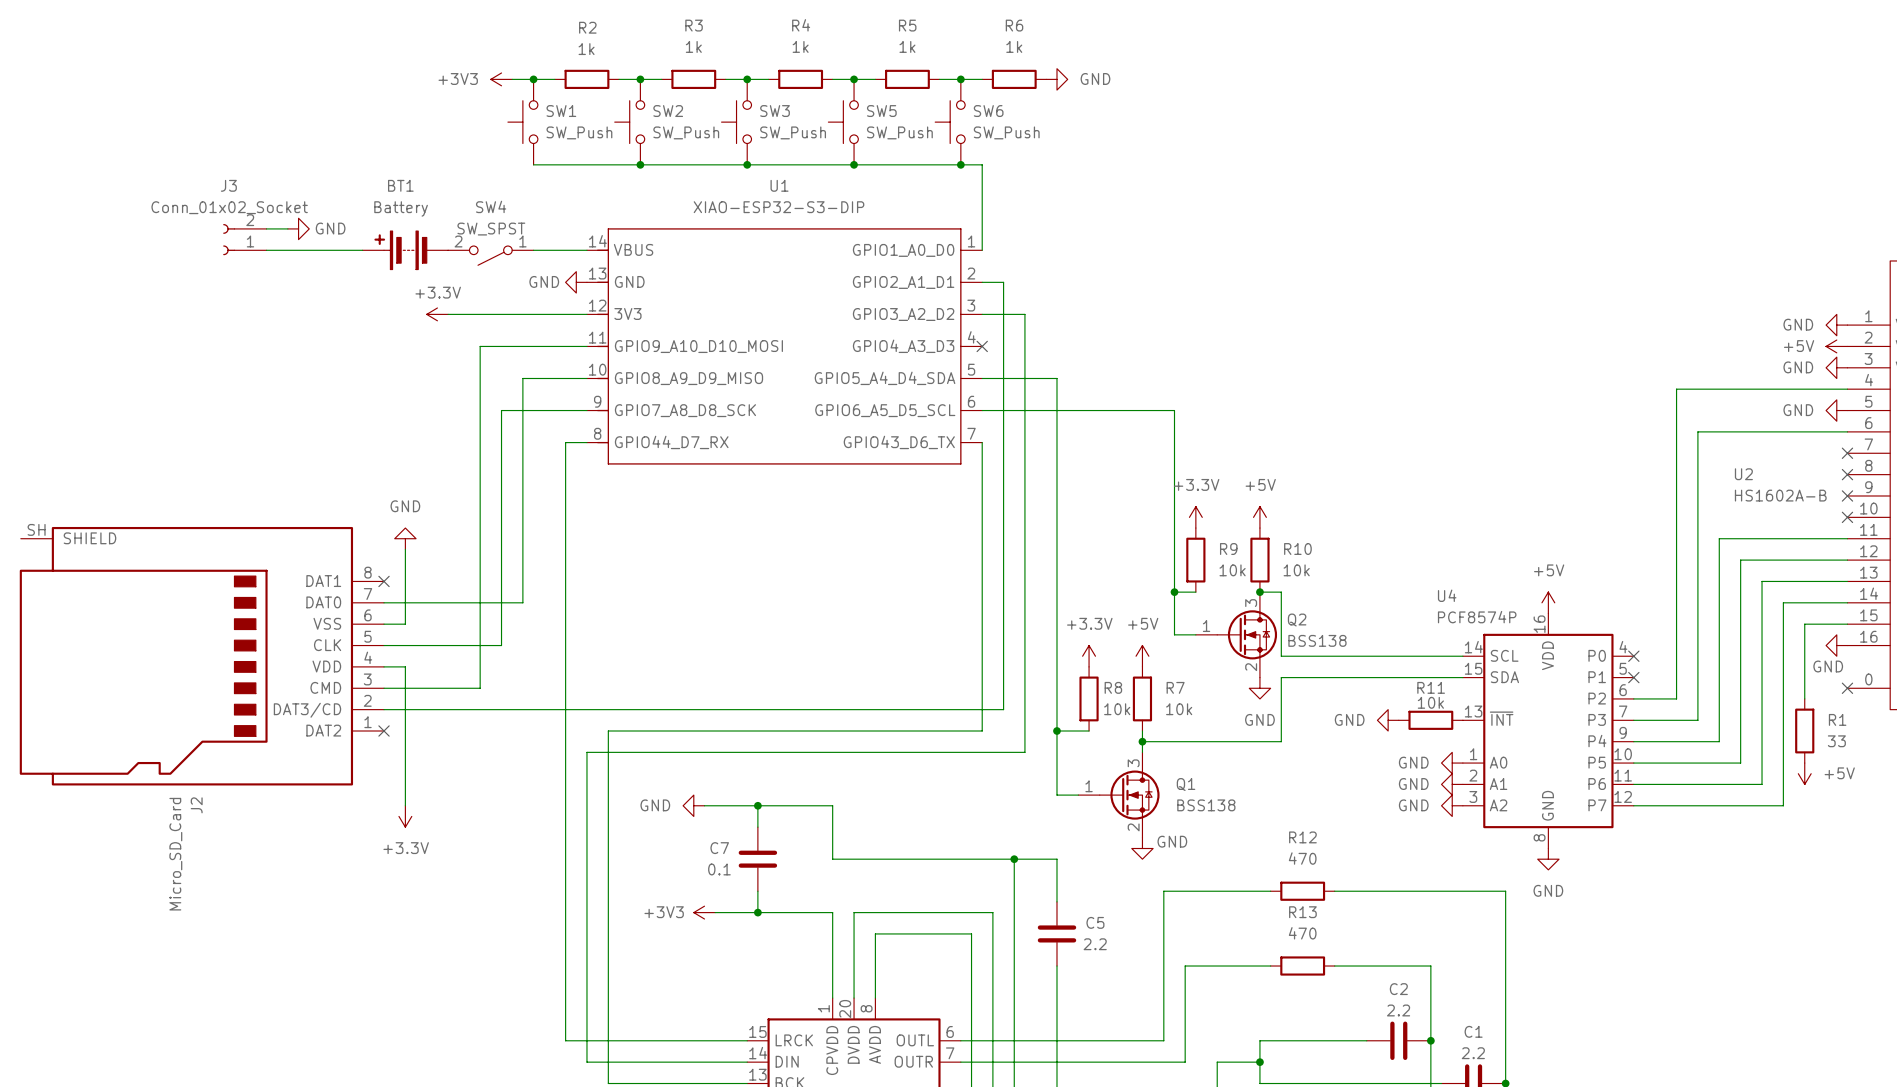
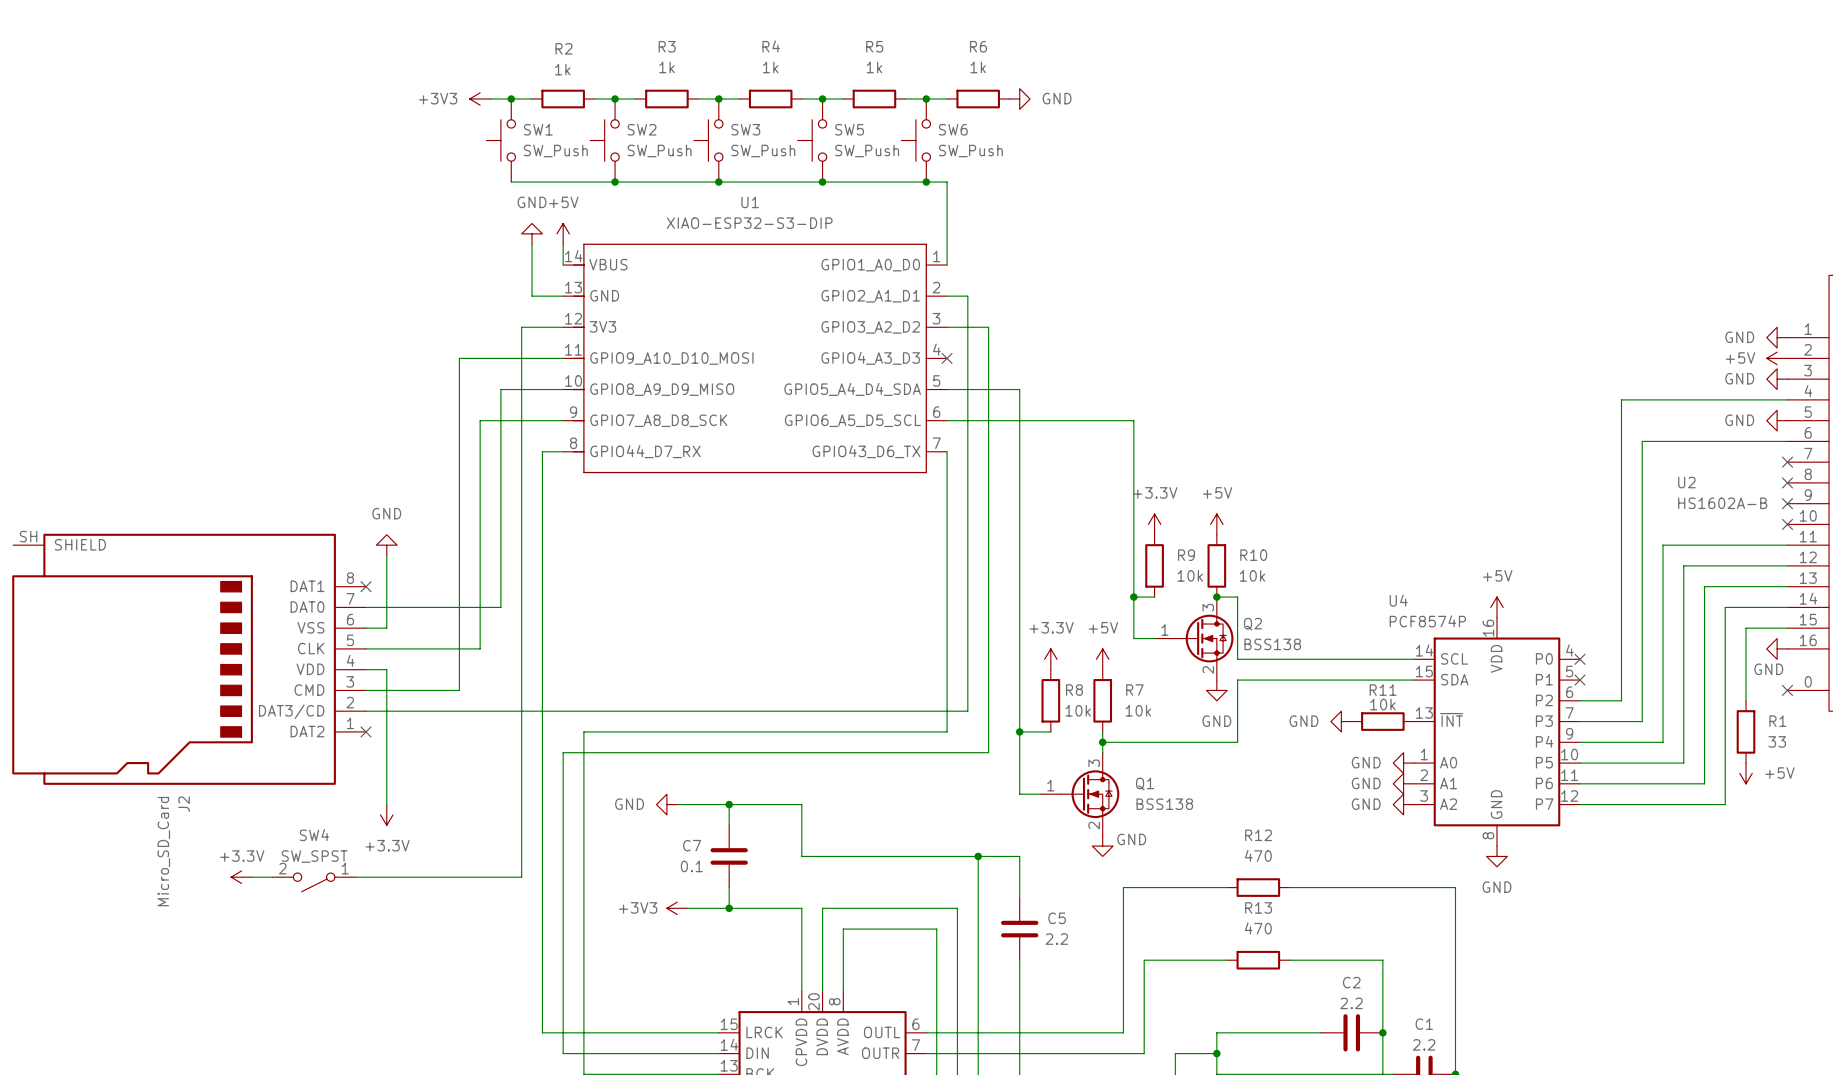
power symbol: none -> +5V (563, 233)
wire: (266, 228) (287, 228) -> none
power symbol: GND (298, 228) -> none
wire: none -> (532, 244) (532, 296) (563, 296)
J3: Conn_01x02_Socket (244, 239) -> none
wire: (266, 250) (362, 250) -> none
BT1: Battery (405, 250) -> none
wire: (533, 250) (586, 250) -> (563, 244) (563, 265)
SW4 position: (490, 255) -> (314, 882)
power symbol rotation: 0° (576, 282) -> 90° clockwise (532, 233)
power symbol position: GND (576, 282) -> GND (532, 233)
power symbol: +3.3V (437, 314) -> none
wire: (448, 314) (544, 314) -> (355, 877) (521, 877) (521, 327)
power symbol: none -> +3.3V (241, 877)
wire: none -> (251, 877) (272, 877)

